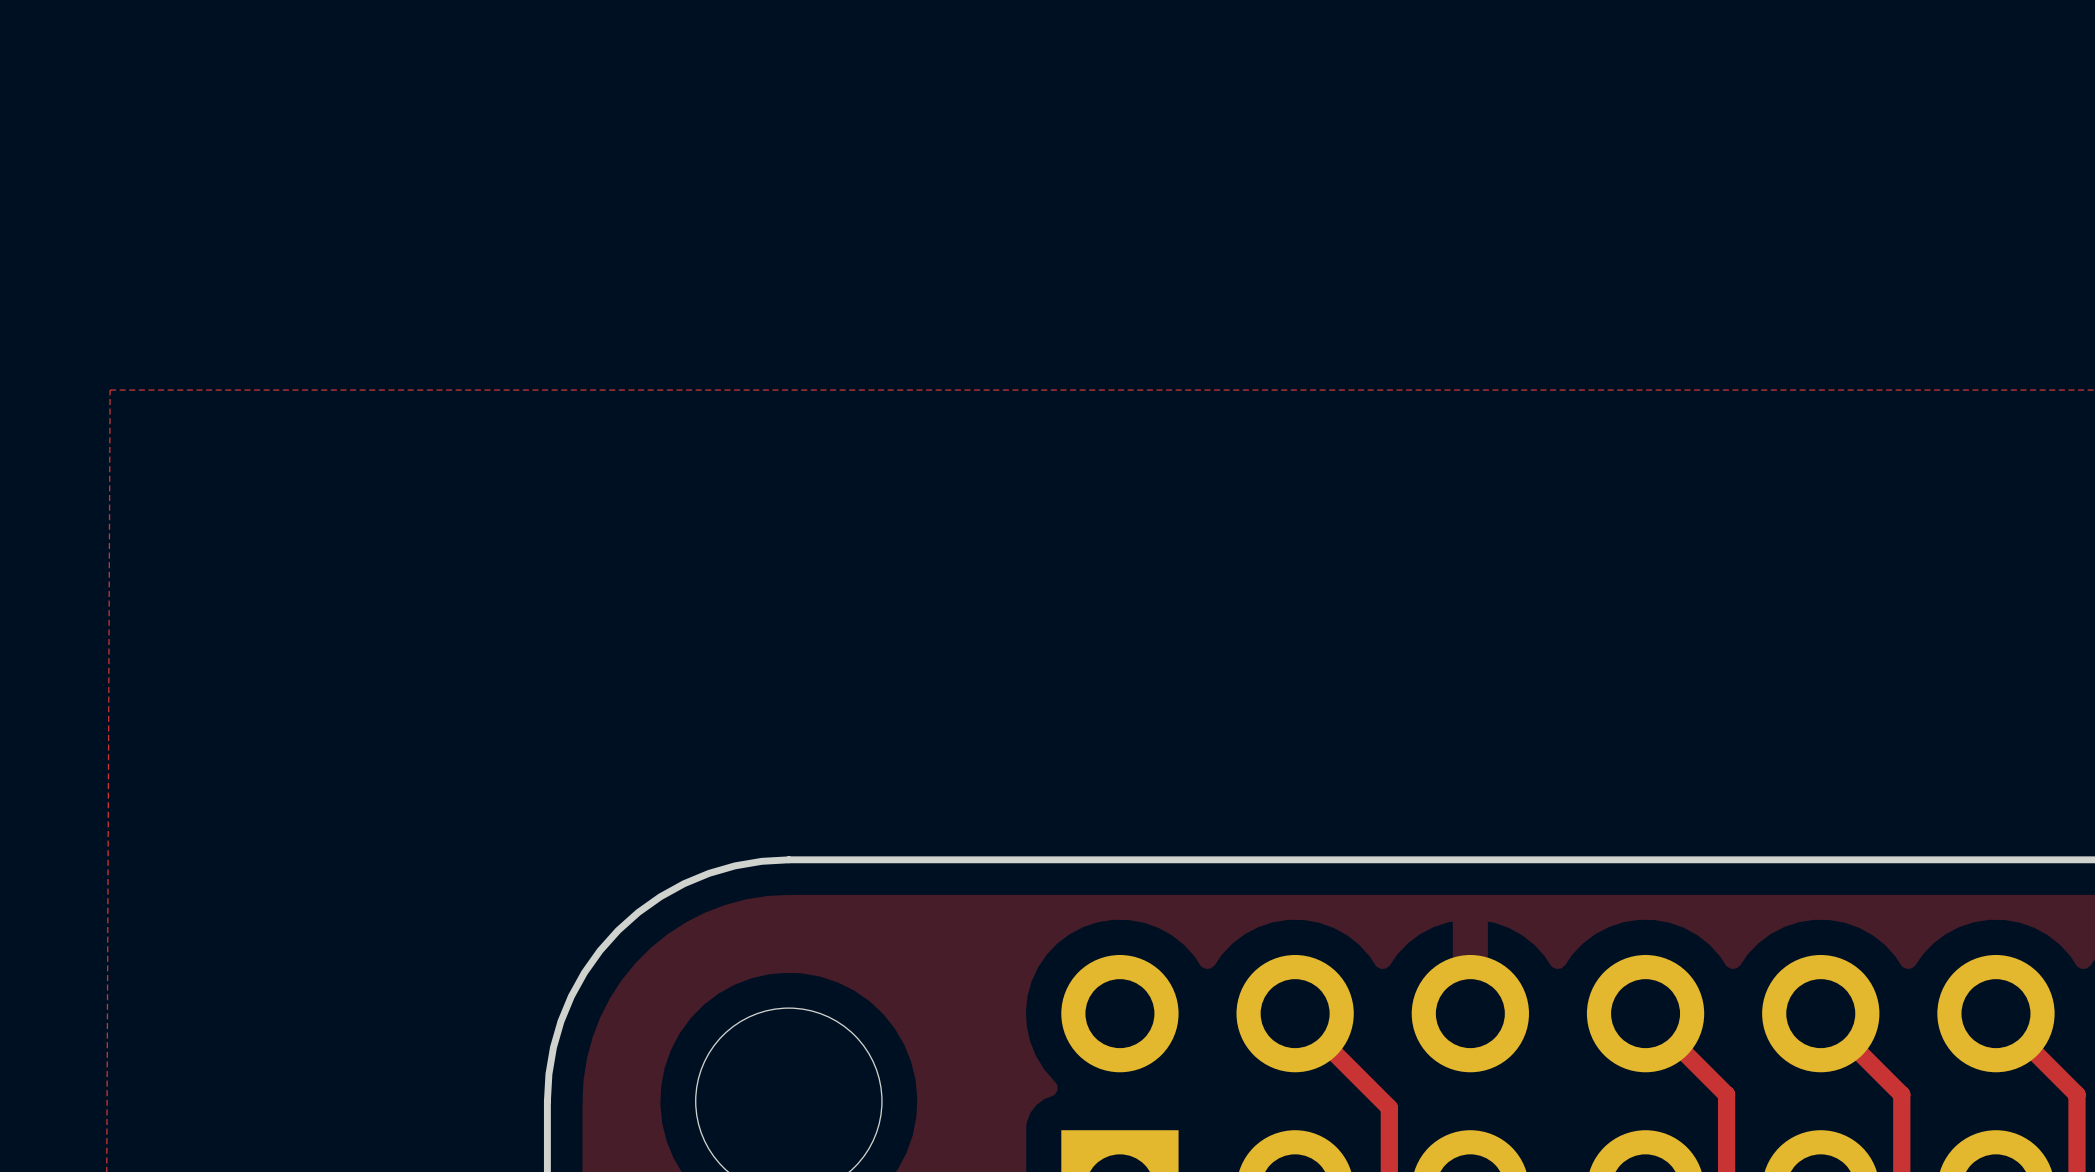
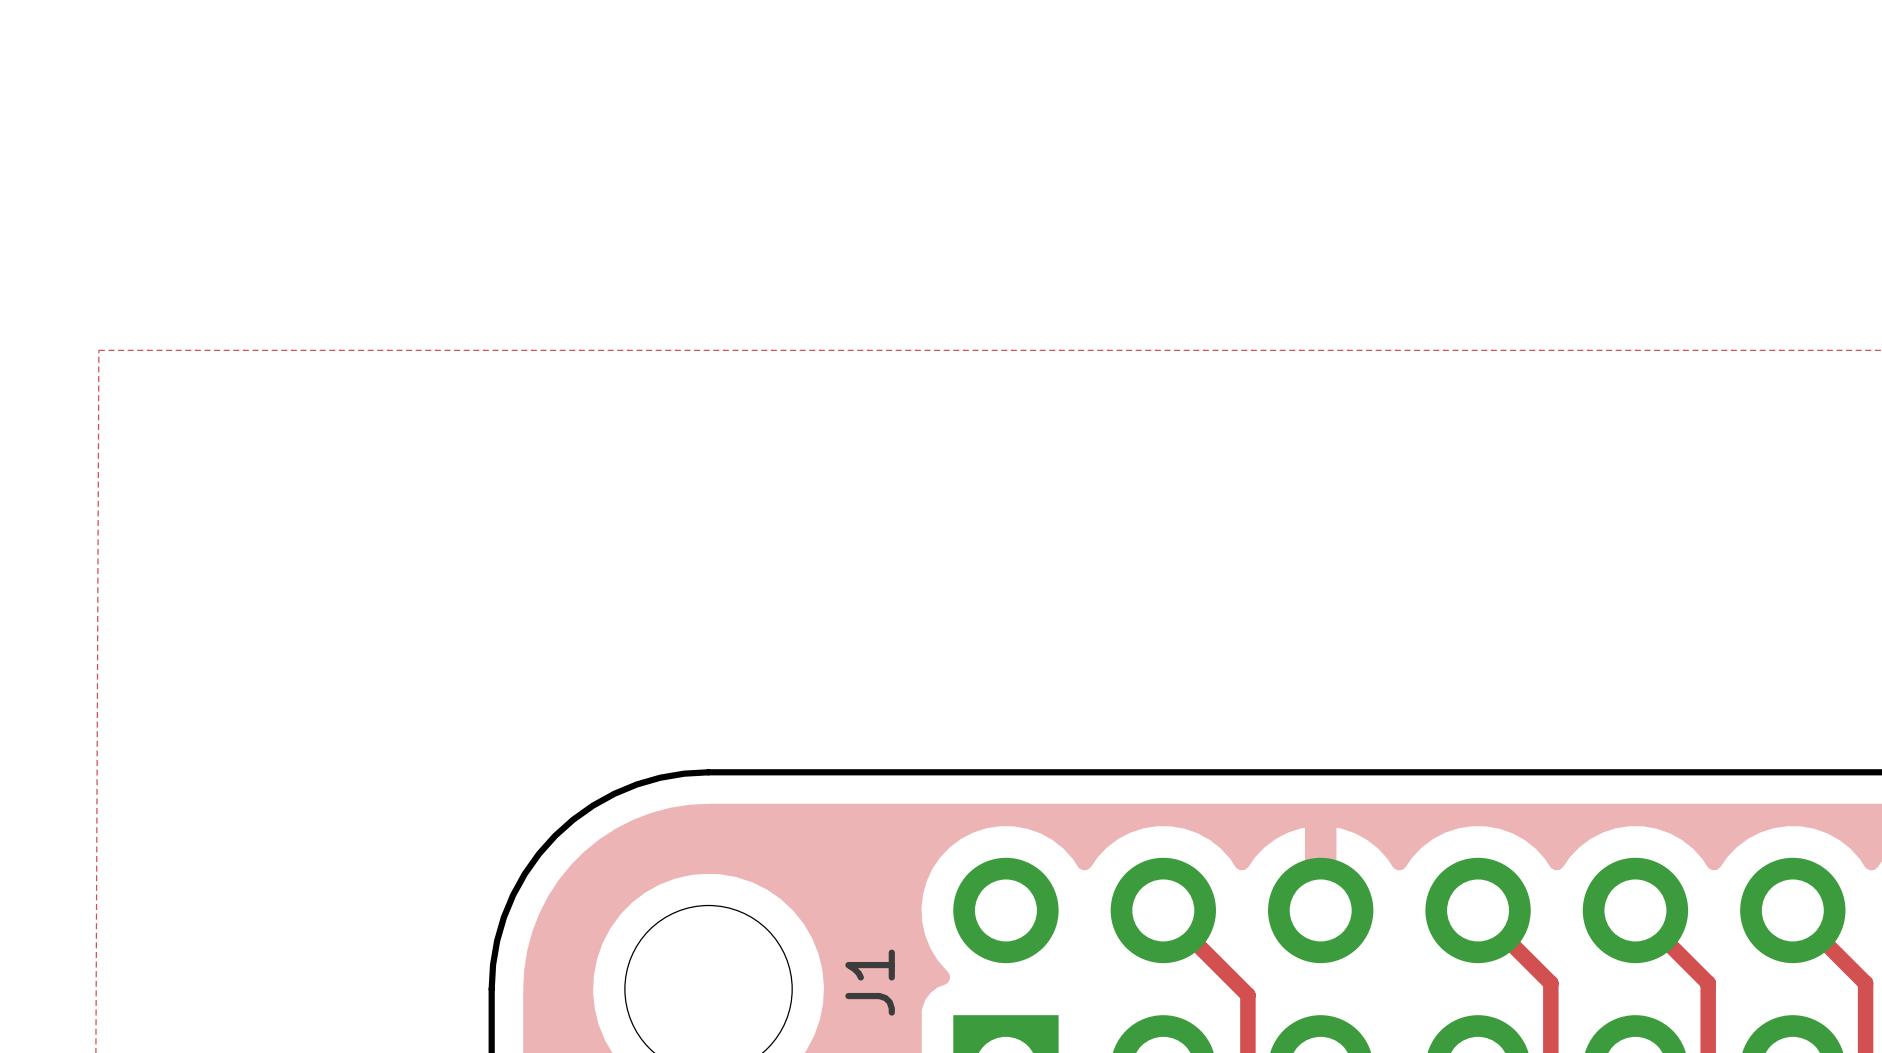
J1 name: none -> J1 (870, 982)

